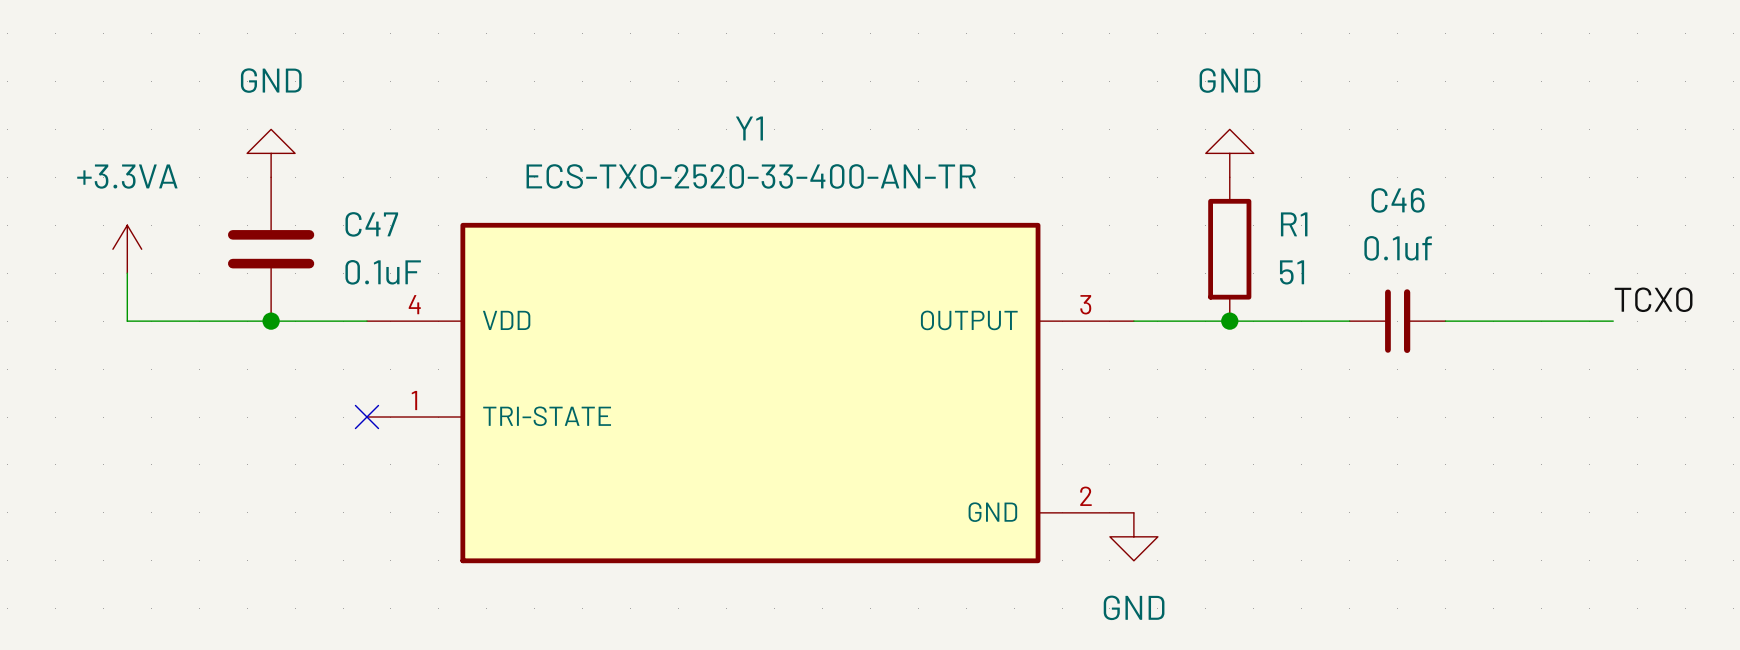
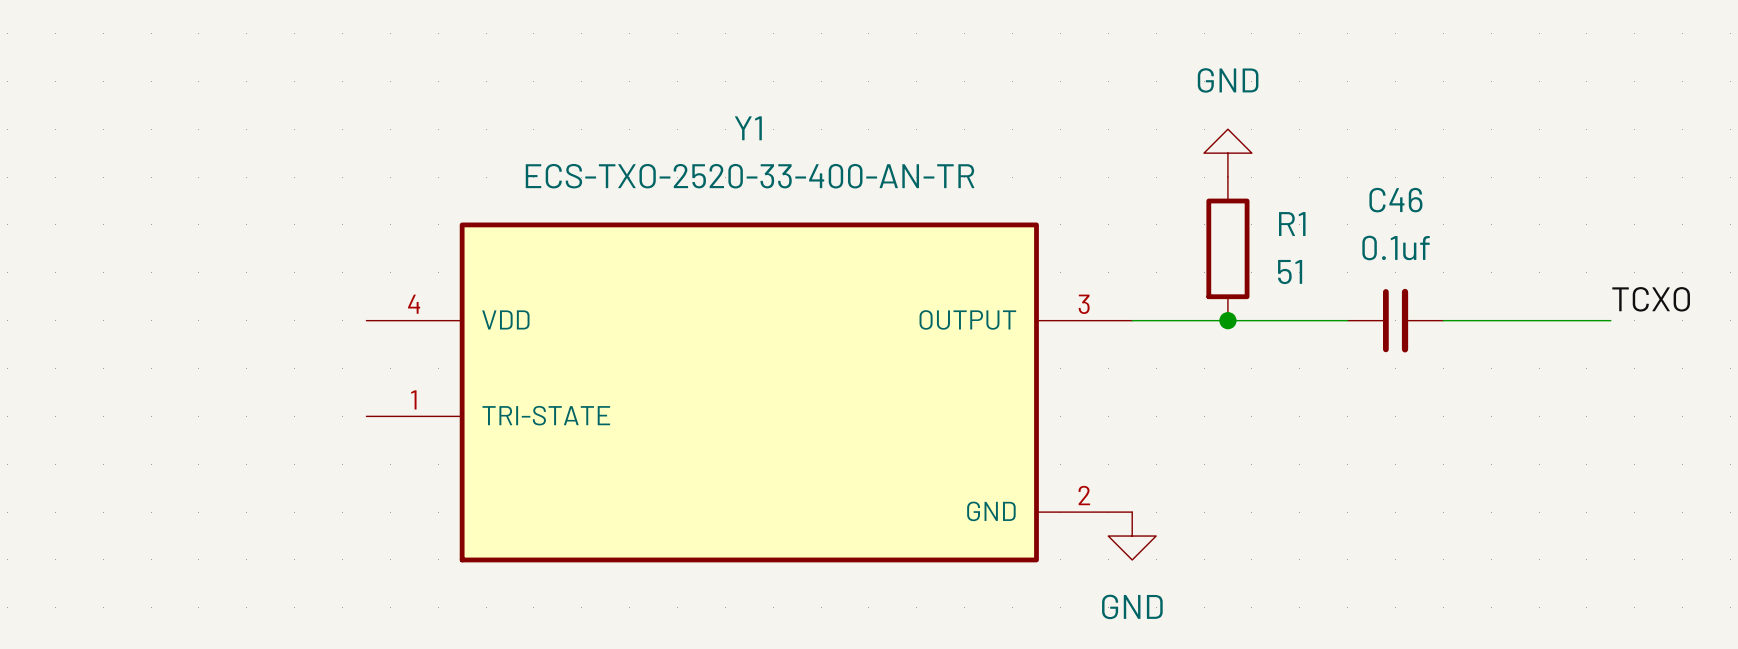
power symbol: GND (271, 153) -> none
power symbol: +3.3VA (127, 249) -> none
C47: 0.1uF (271, 249) -> none
wire: (127, 273) (127, 321) (366, 321) -> none
junction: (271, 321) -> none
no-connect mark: (366, 417) -> none

